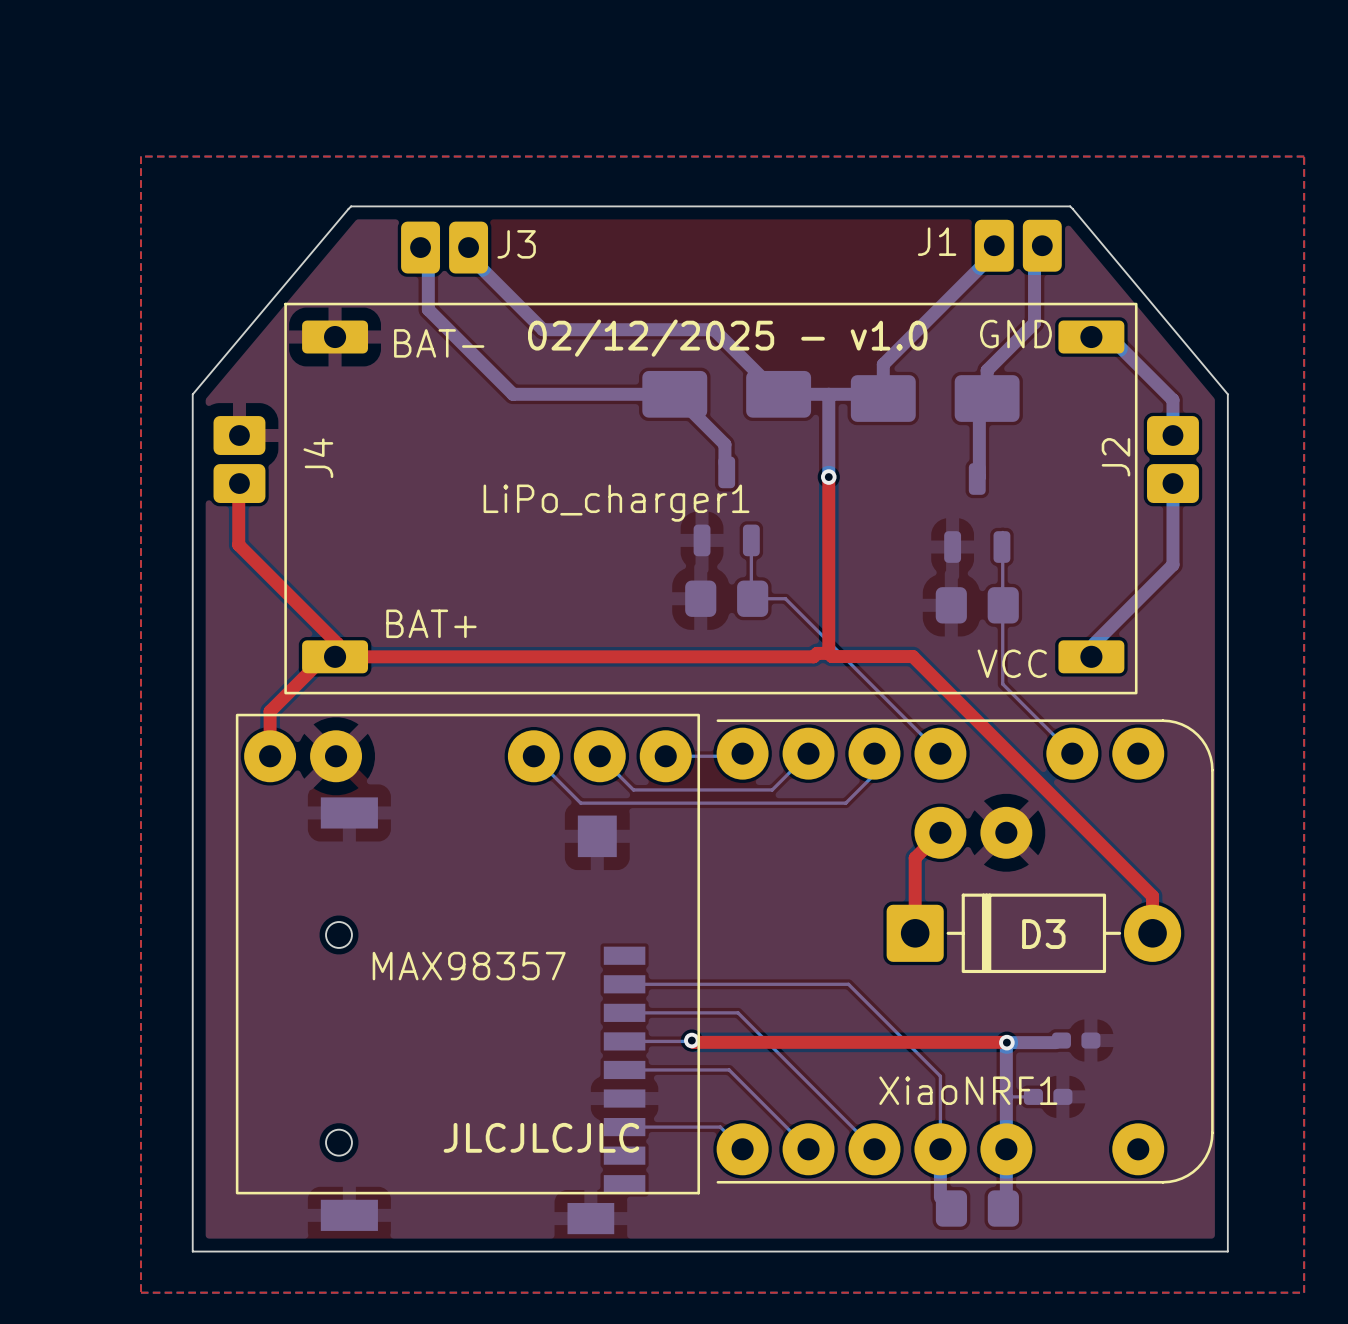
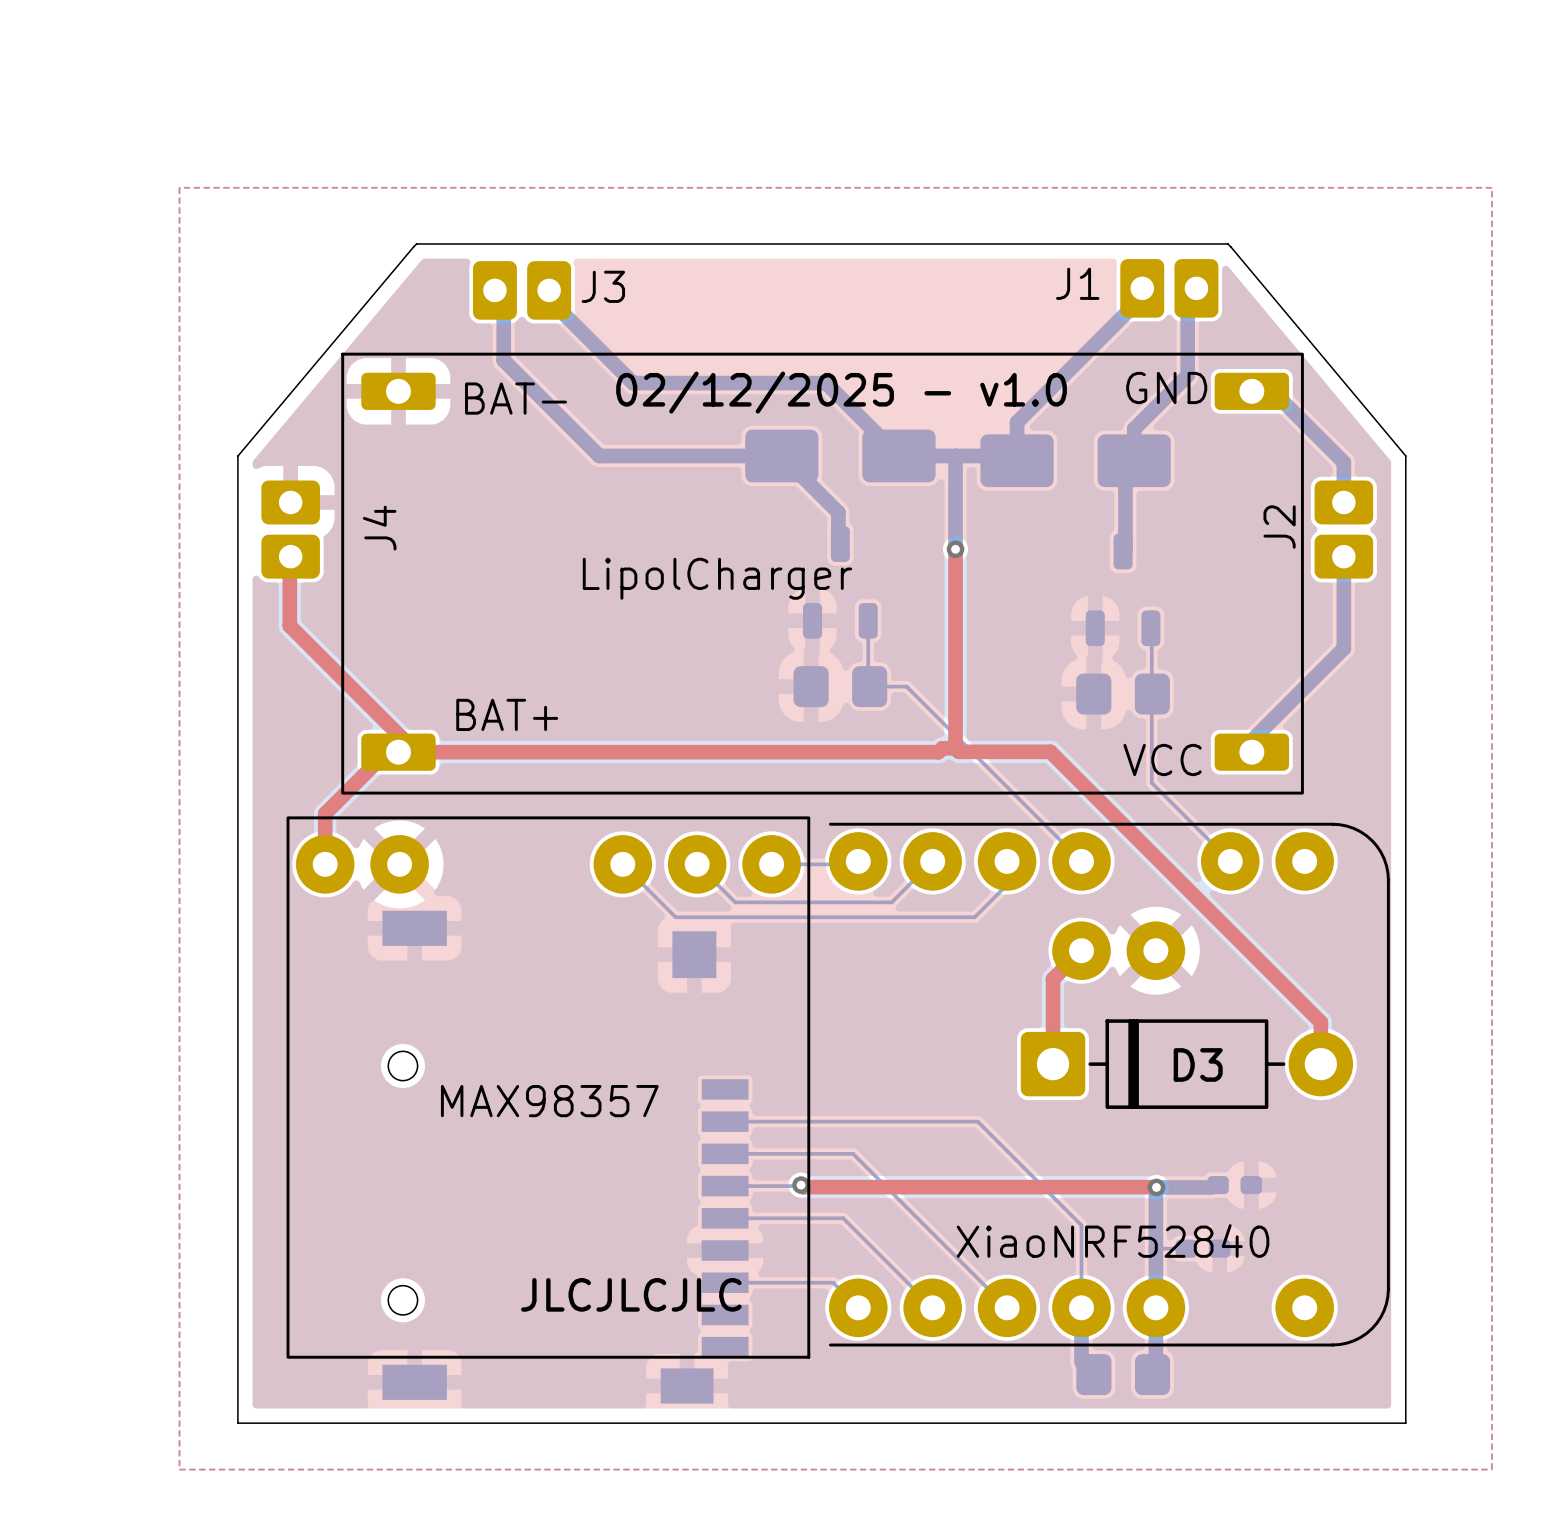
LiPo_charger1 name: LiPo_charger1 (616, 503) -> LipolCharger (717, 578)
XiaoNRF1 name: XiaoNRF1 (968, 1090) -> XiaoNRF52840 (1113, 1241)

